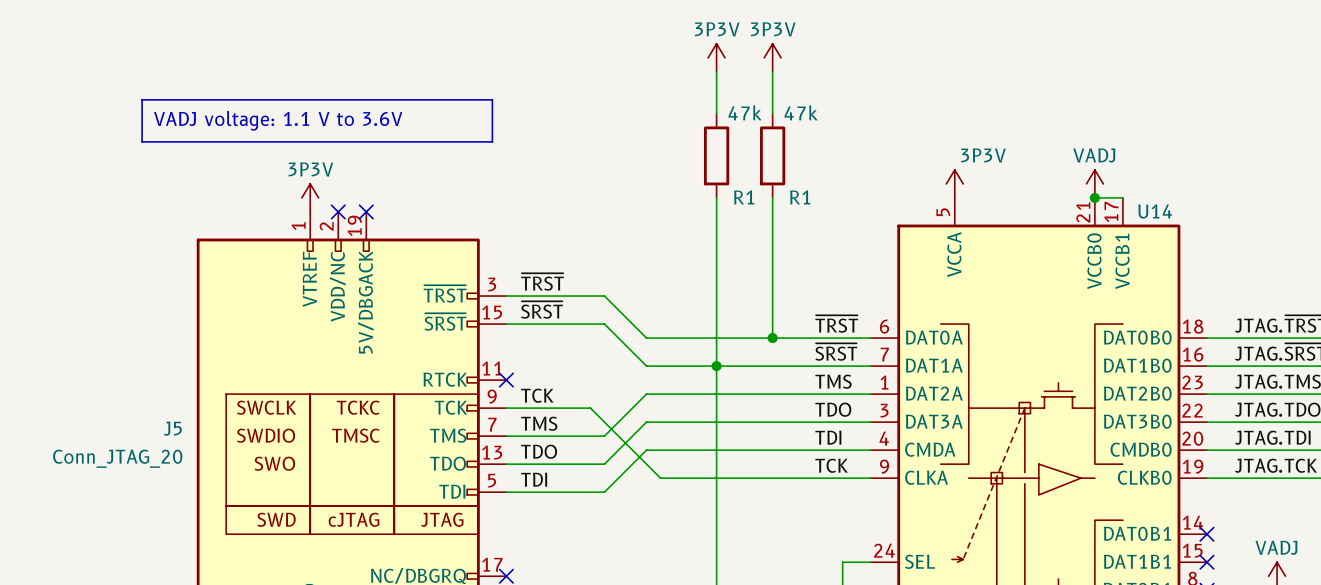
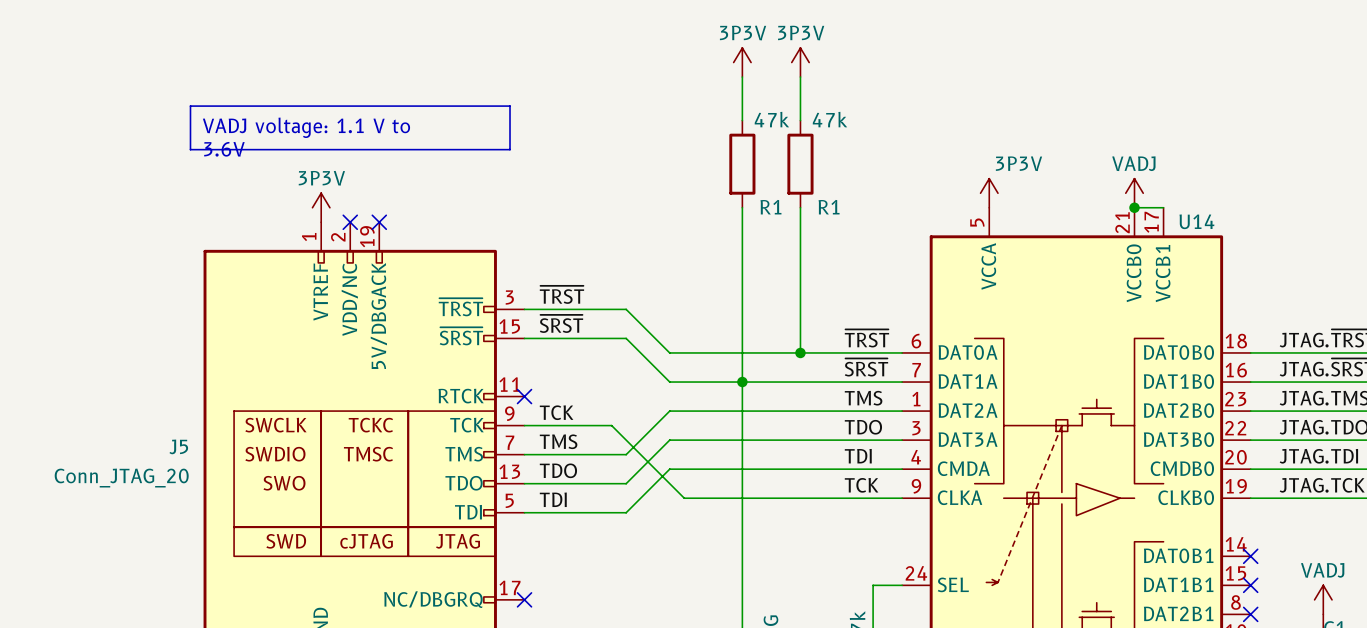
line: (184, 99) (142, 99) (142, 141) (184, 141) -> (190, 106) (190, 149)
text: VADJ voltage: 1.1 V to 3.6V (278, 120) -> VADJ voltage: 1.1 V to (306, 127)
text: none -> 3.6V (224, 149)

